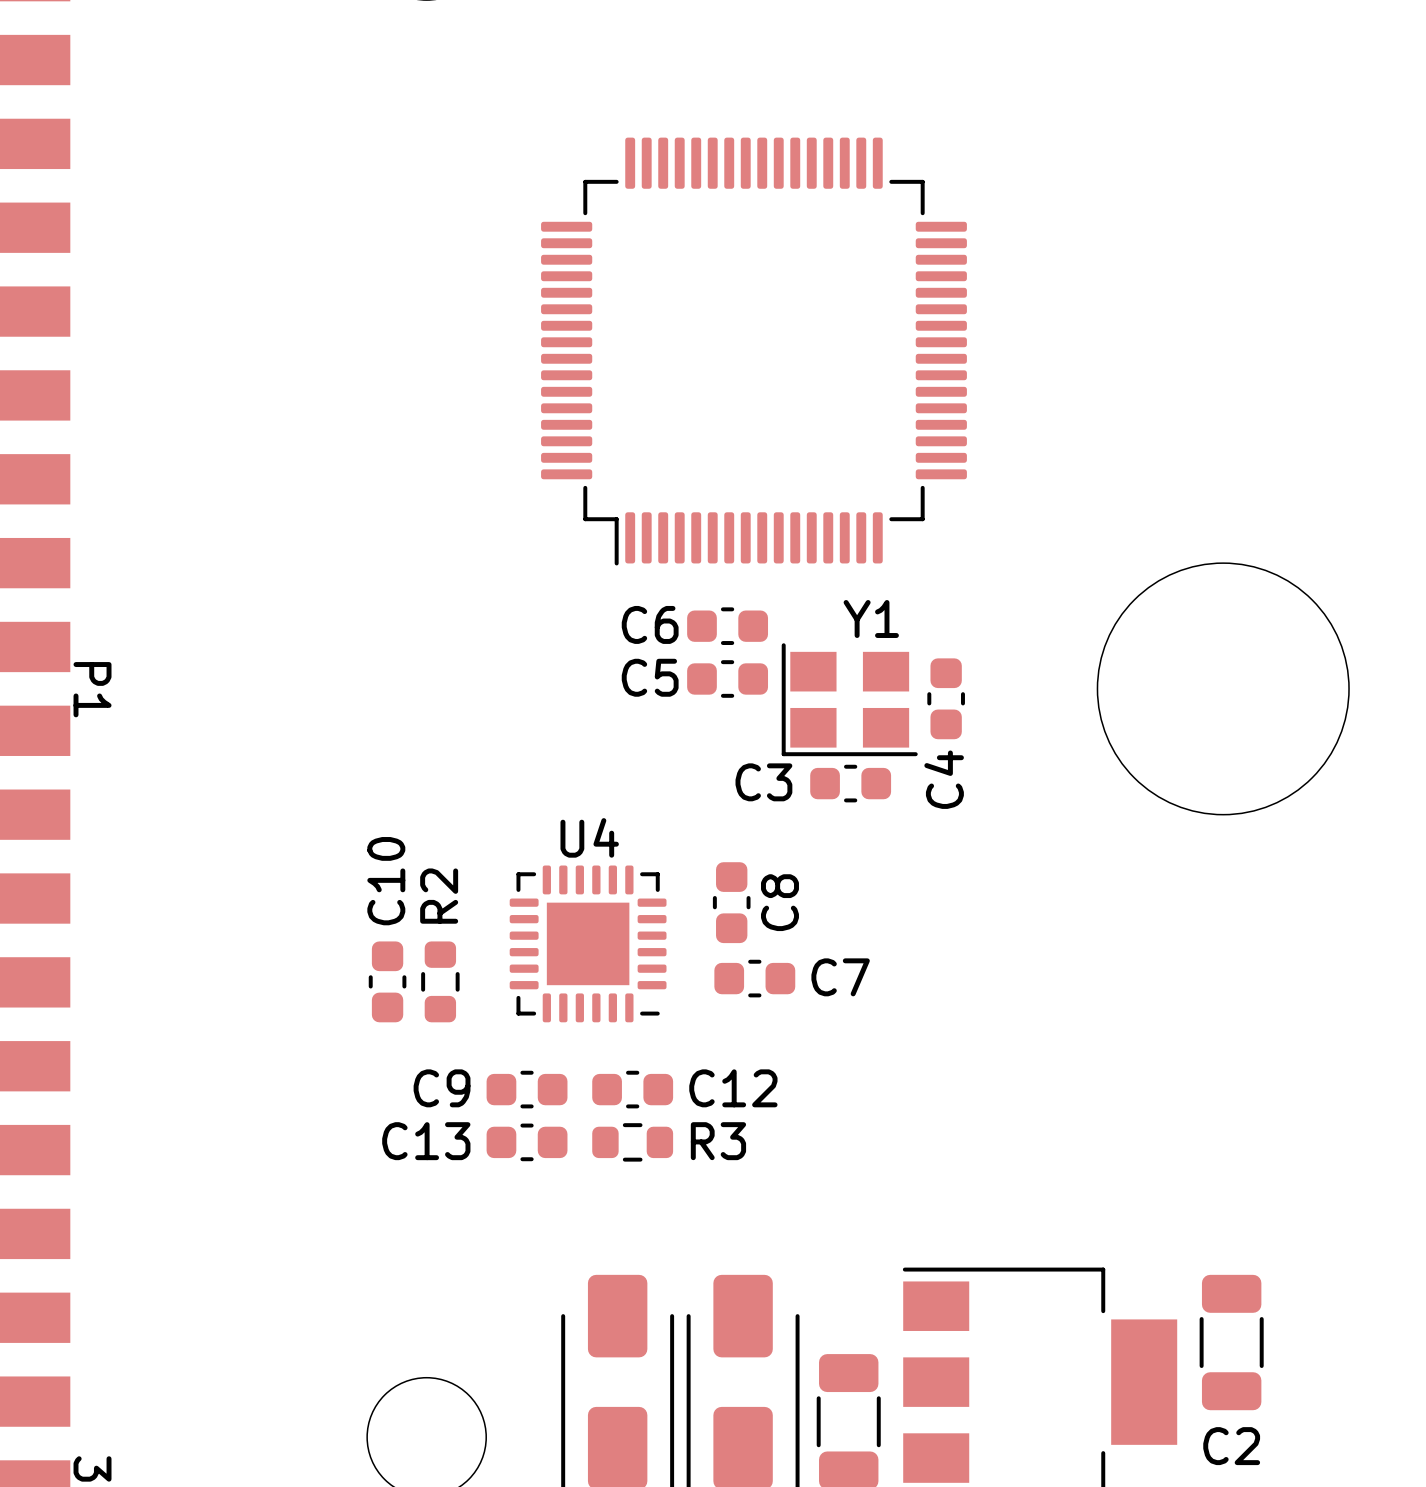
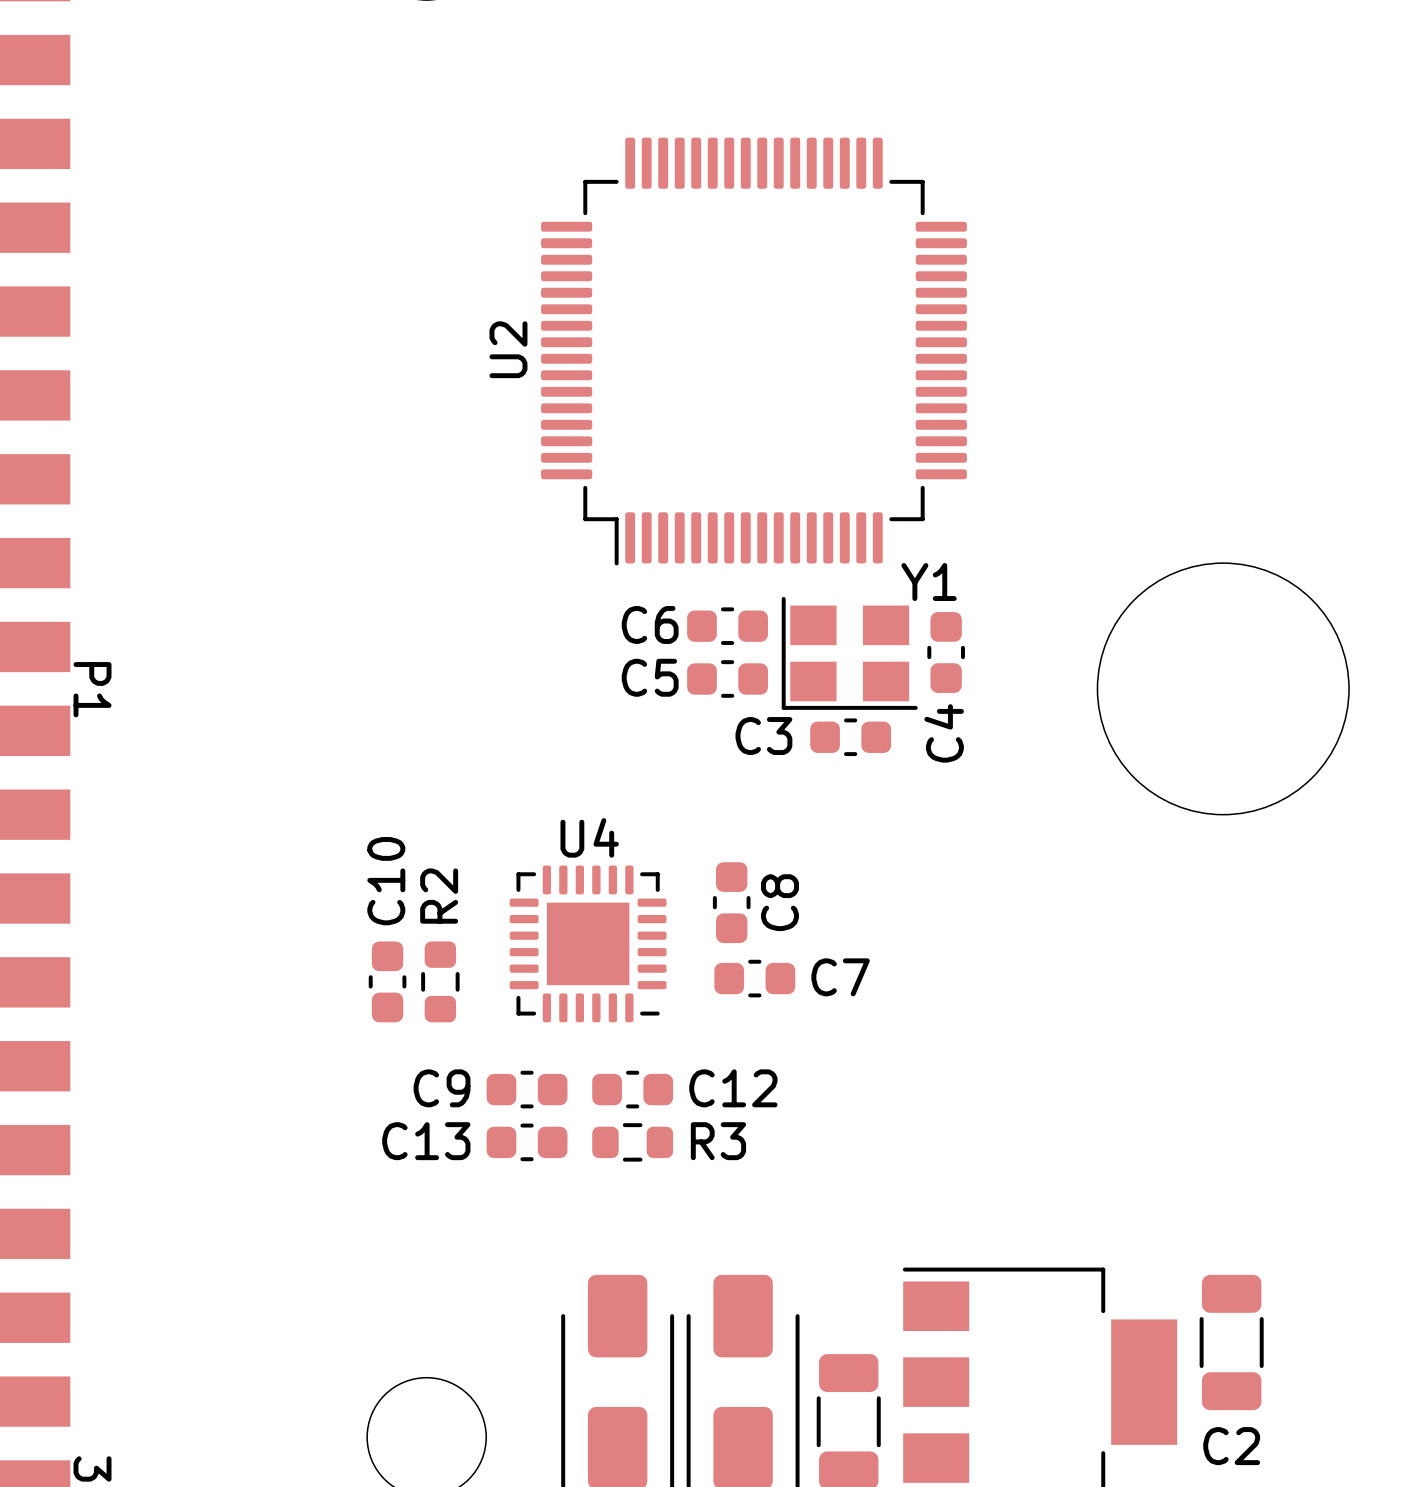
U2 name: none -> U2 (508, 349)
Y1 name position: Y1 (871, 619) -> Y1 (929, 582)
C4 position: (946, 698) -> (946, 652)
Y1 position: (849, 699) -> (849, 653)
C3 position: (850, 783) -> (850, 737)

